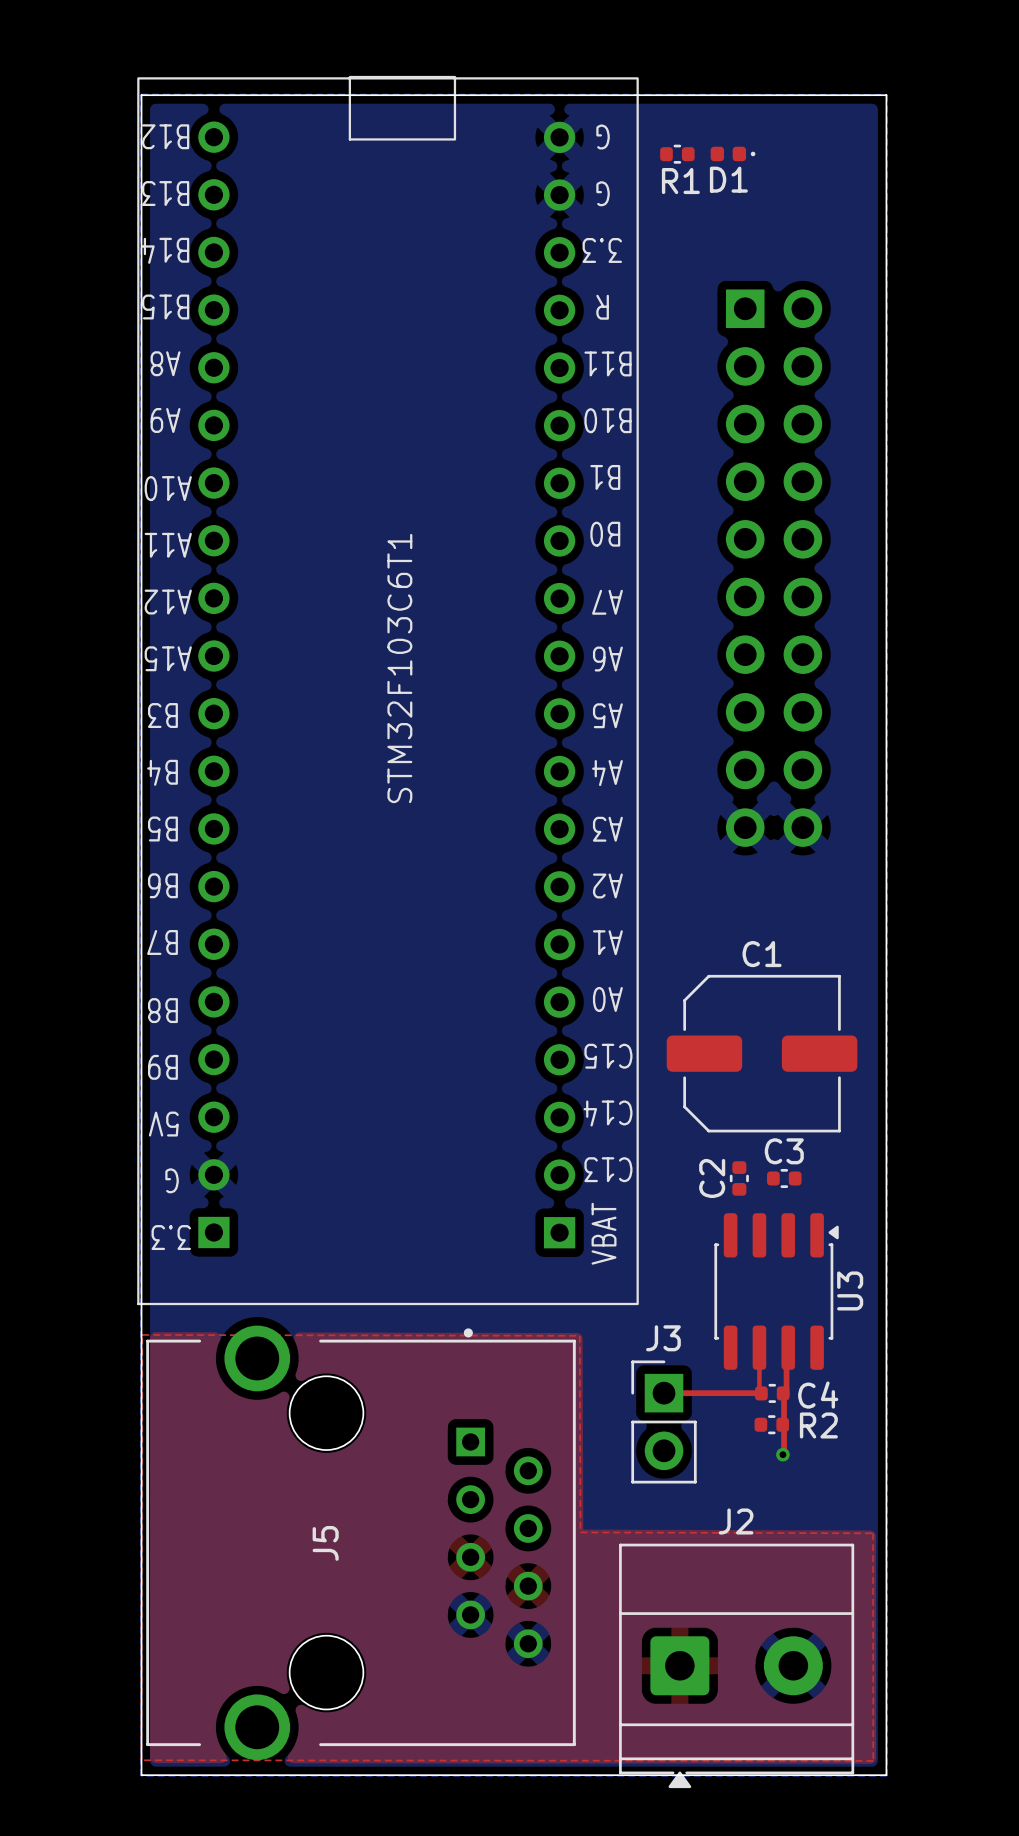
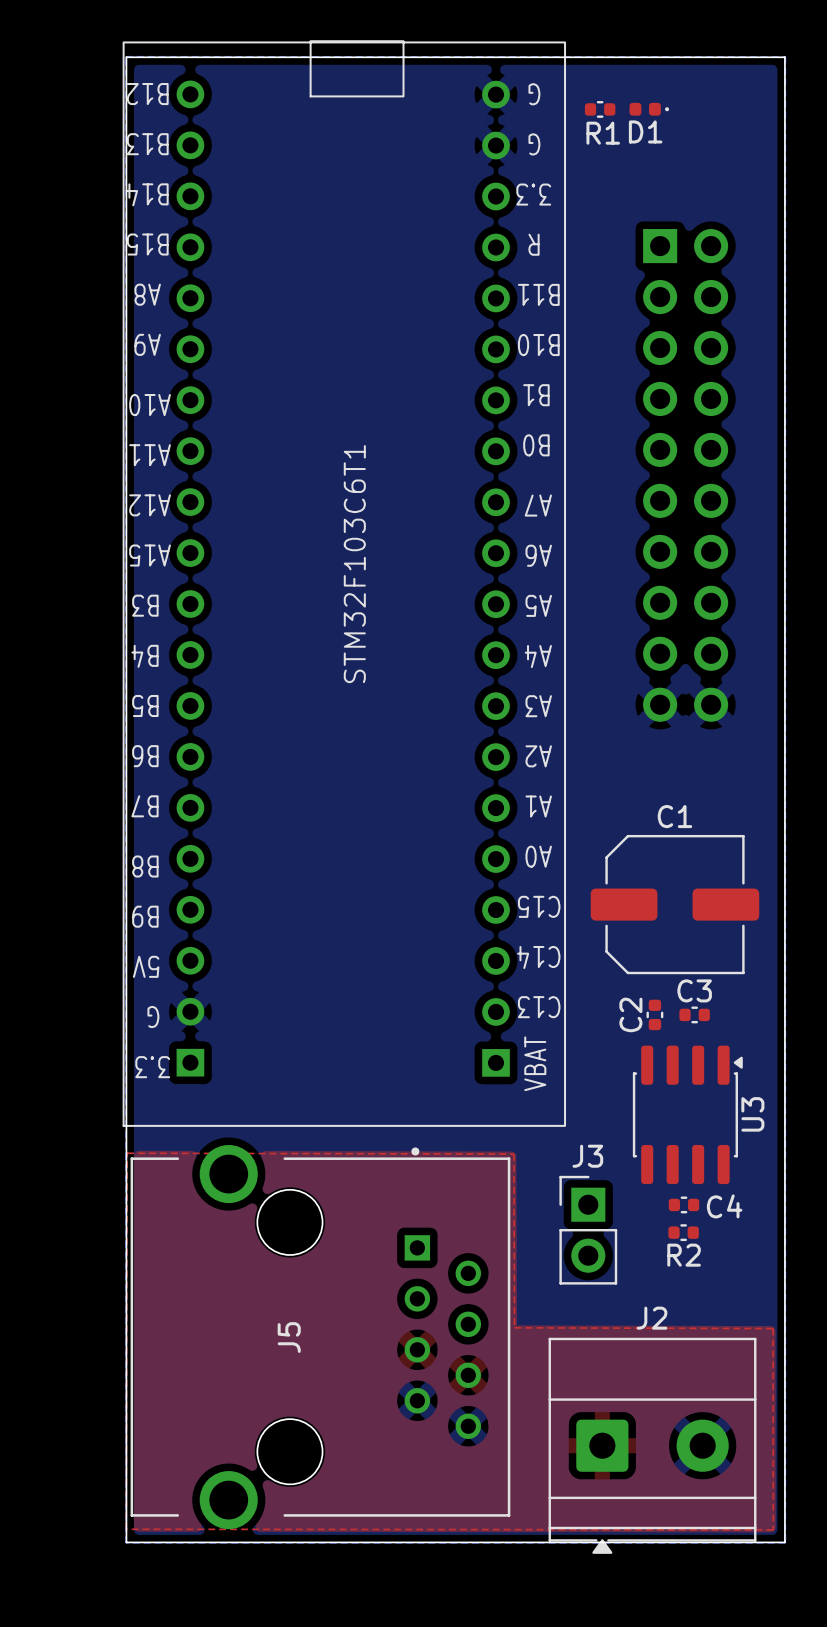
top track: (759, 1347) (759, 1388) (764, 1394) (664, 1393) -> none
top track: (788, 1347) (786, 1349) (786, 1394) (784, 1396) (782, 1454) -> none
R2 name position: R2 (818, 1425) -> R2 (684, 1255)
via: (782, 1454) -> none

